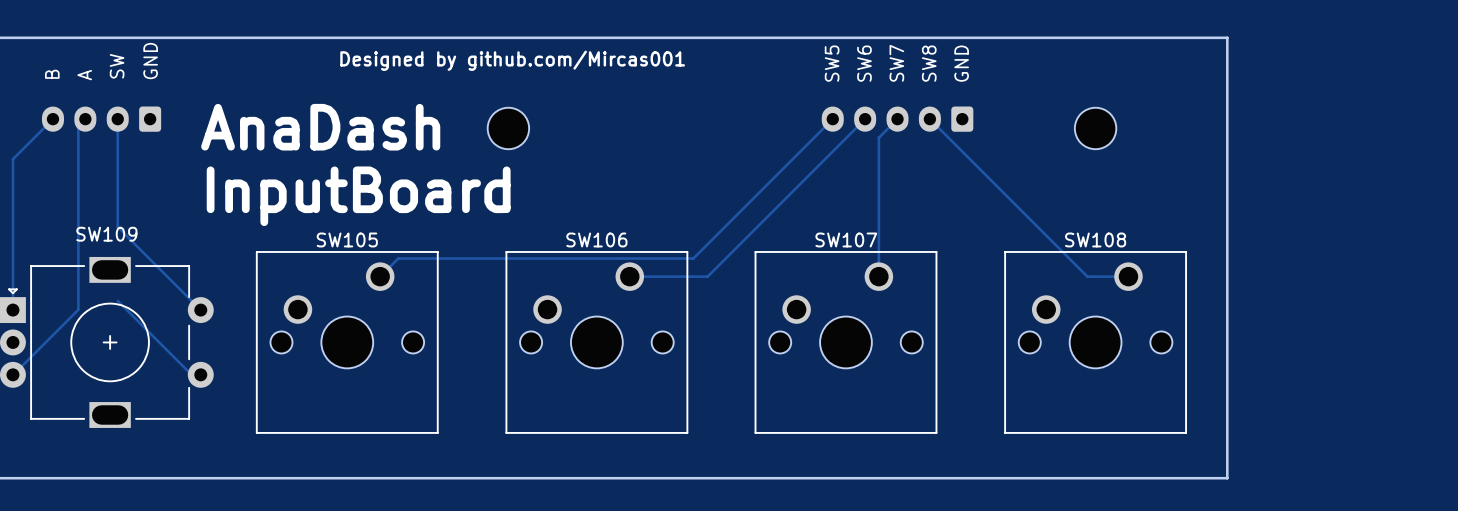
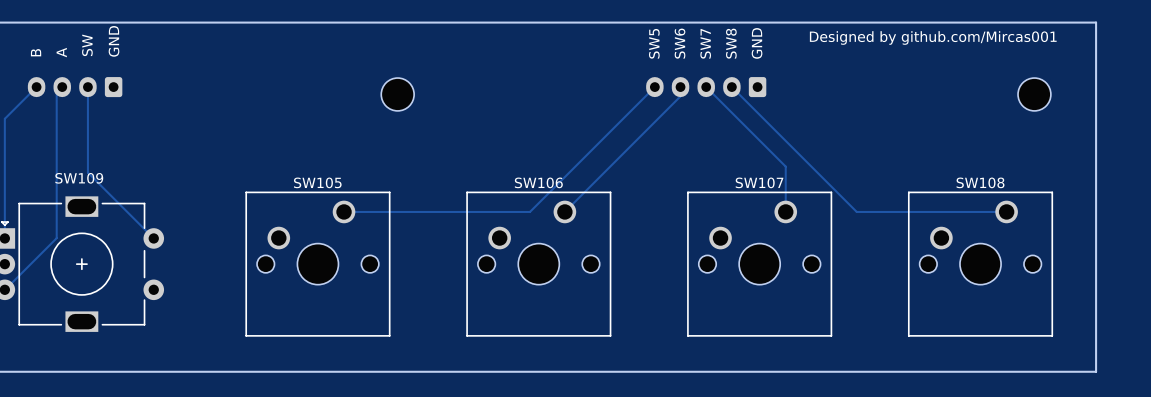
board edge: (1227, 37) (1227, 478) -> (967, 22) (1096, 22) (1096, 371) (967, 371)
text: none -> Designed by github.com/Mircas001 (933, 37)
text: Designed by github.com/Mircas001 (512, 60) -> none
track: (865, 119) (707, 276) (675, 276) -> (680, 87) (680, 96) (564, 211)
track: (897, 119) (878, 137) (878, 276) -> (706, 87) (785, 166) (785, 211)
text: AnaDash (320, 127) -> none
part position: (1095, 128) -> (1034, 94)
text: InputBoard (358, 196) -> none
track: (693, 258) (398, 258) (380, 276) -> (544, 197) (529, 211)
track: none -> (344, 211) (493, 211)
track: none -> (889, 211) (1006, 211)
track: (117, 300) (200, 383) -> none
SW105 position: (347, 342) -> (317, 264)
SW106 position: (596, 342) -> (538, 264)
SW107 position: (845, 342) -> (759, 264)
SW108 position: (1095, 342) -> (980, 264)

